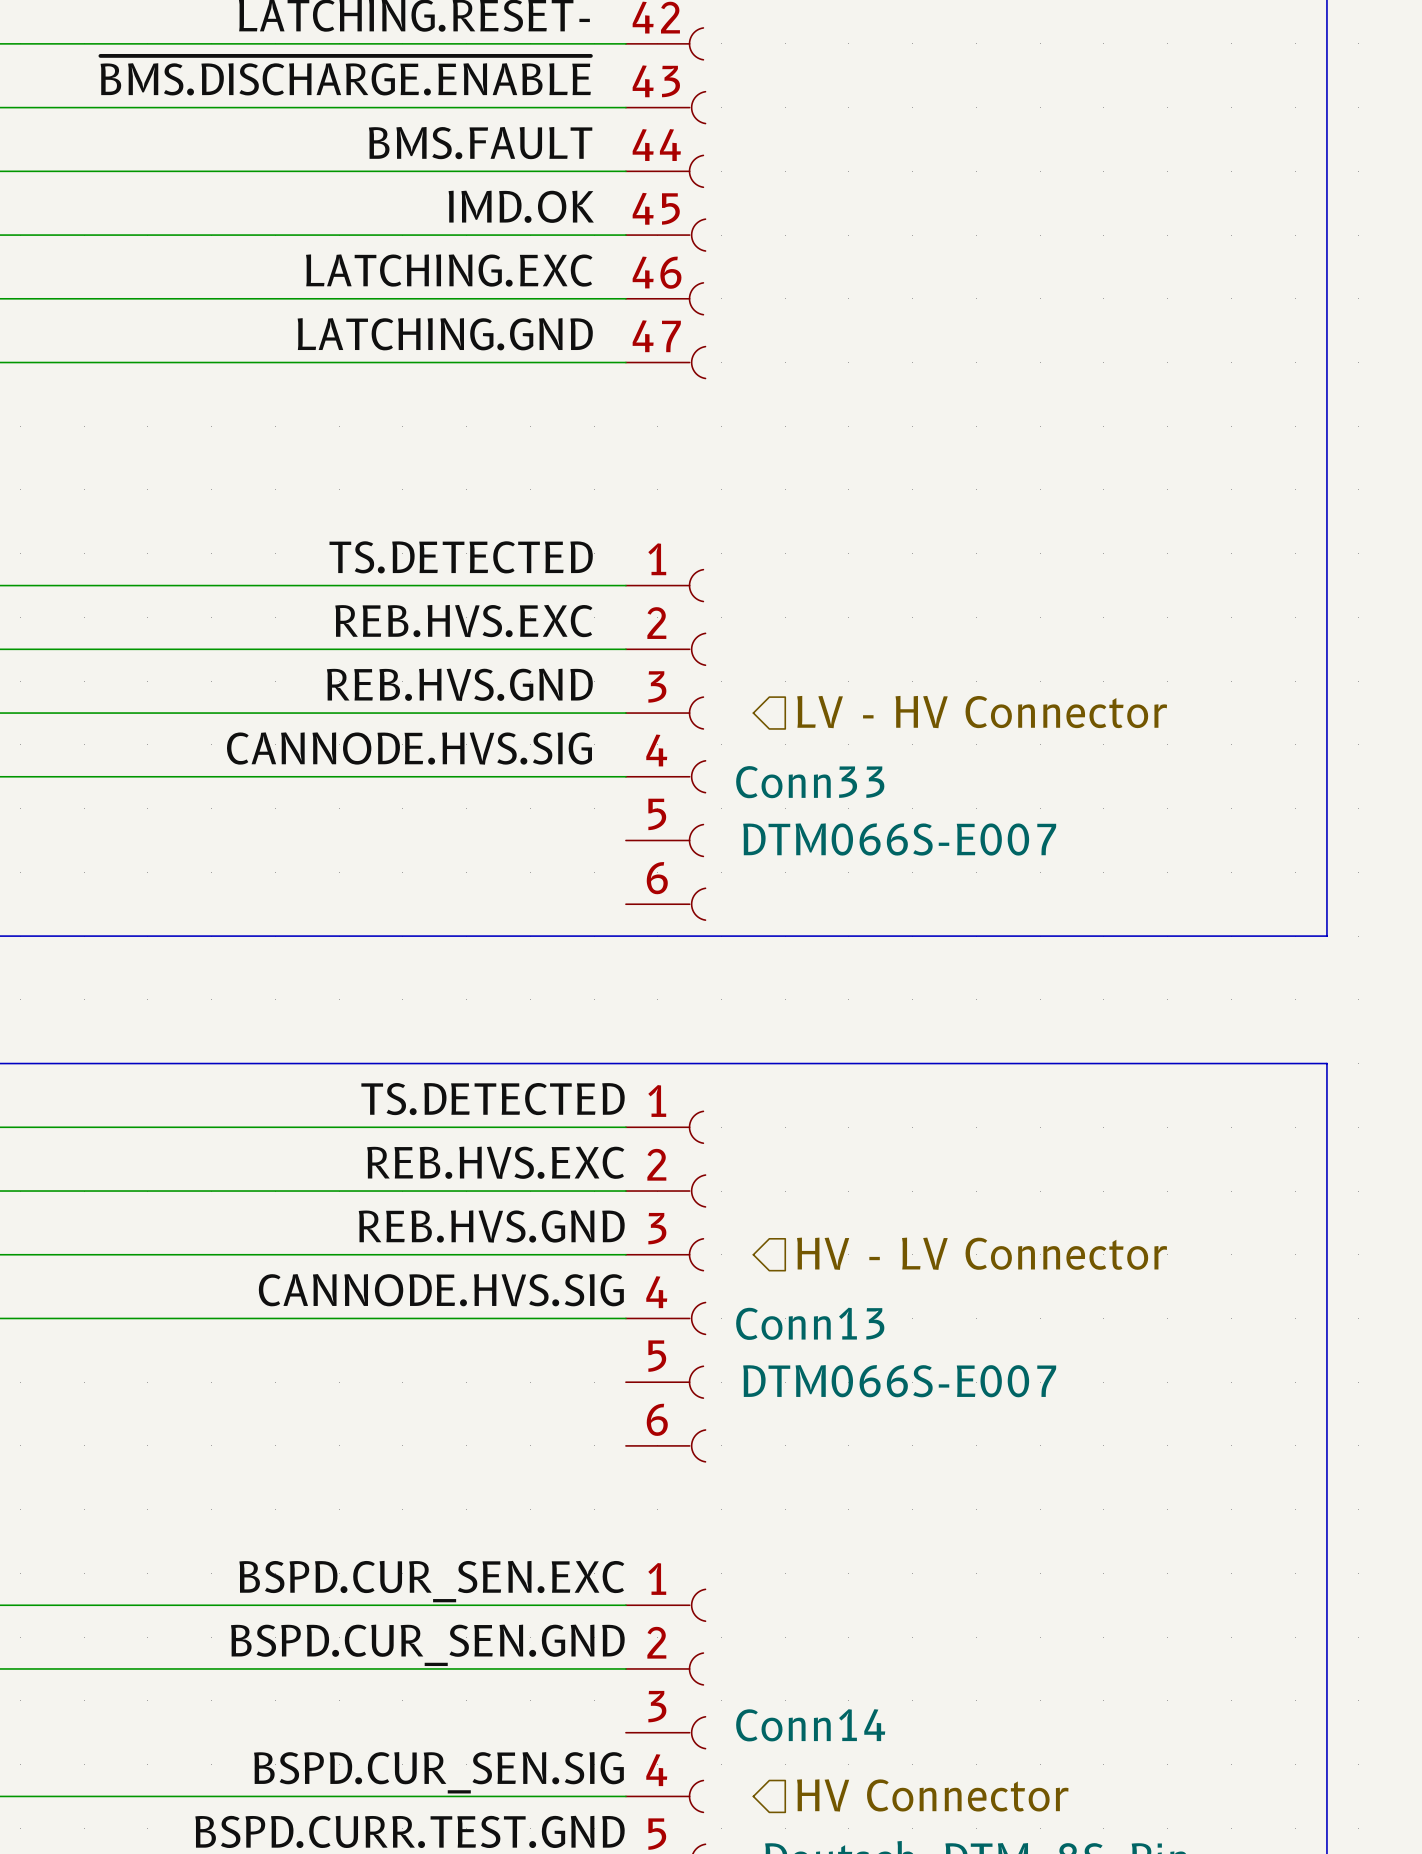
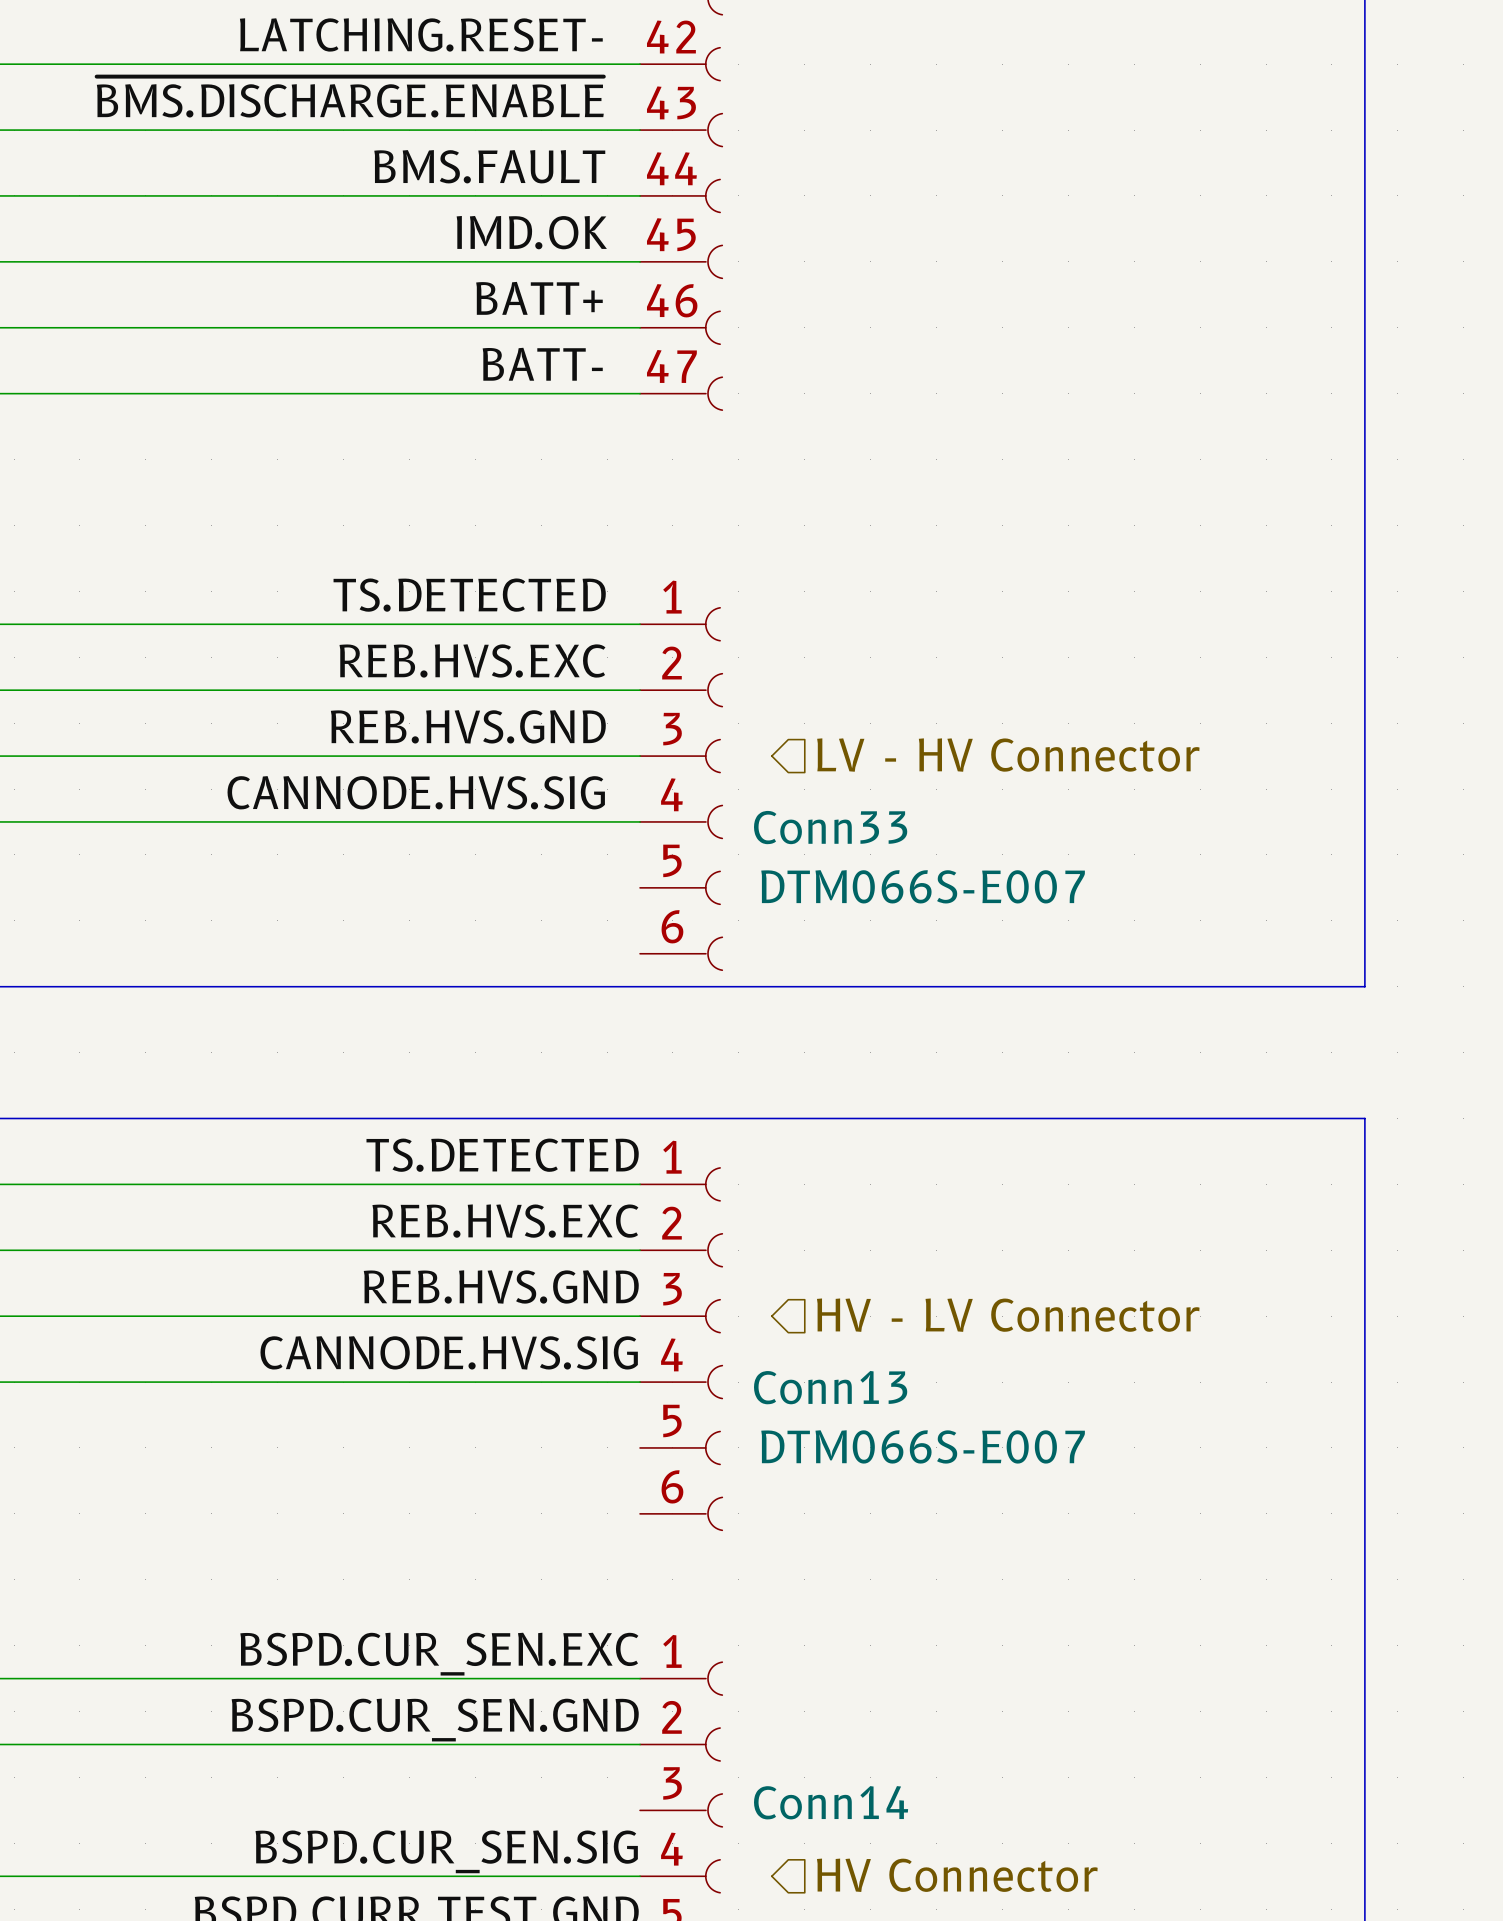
label: LATCHING.EXC (449, 270) -> BATT+ (539, 298)
label: LATCHING.GND (445, 334) -> BATT- (542, 364)

